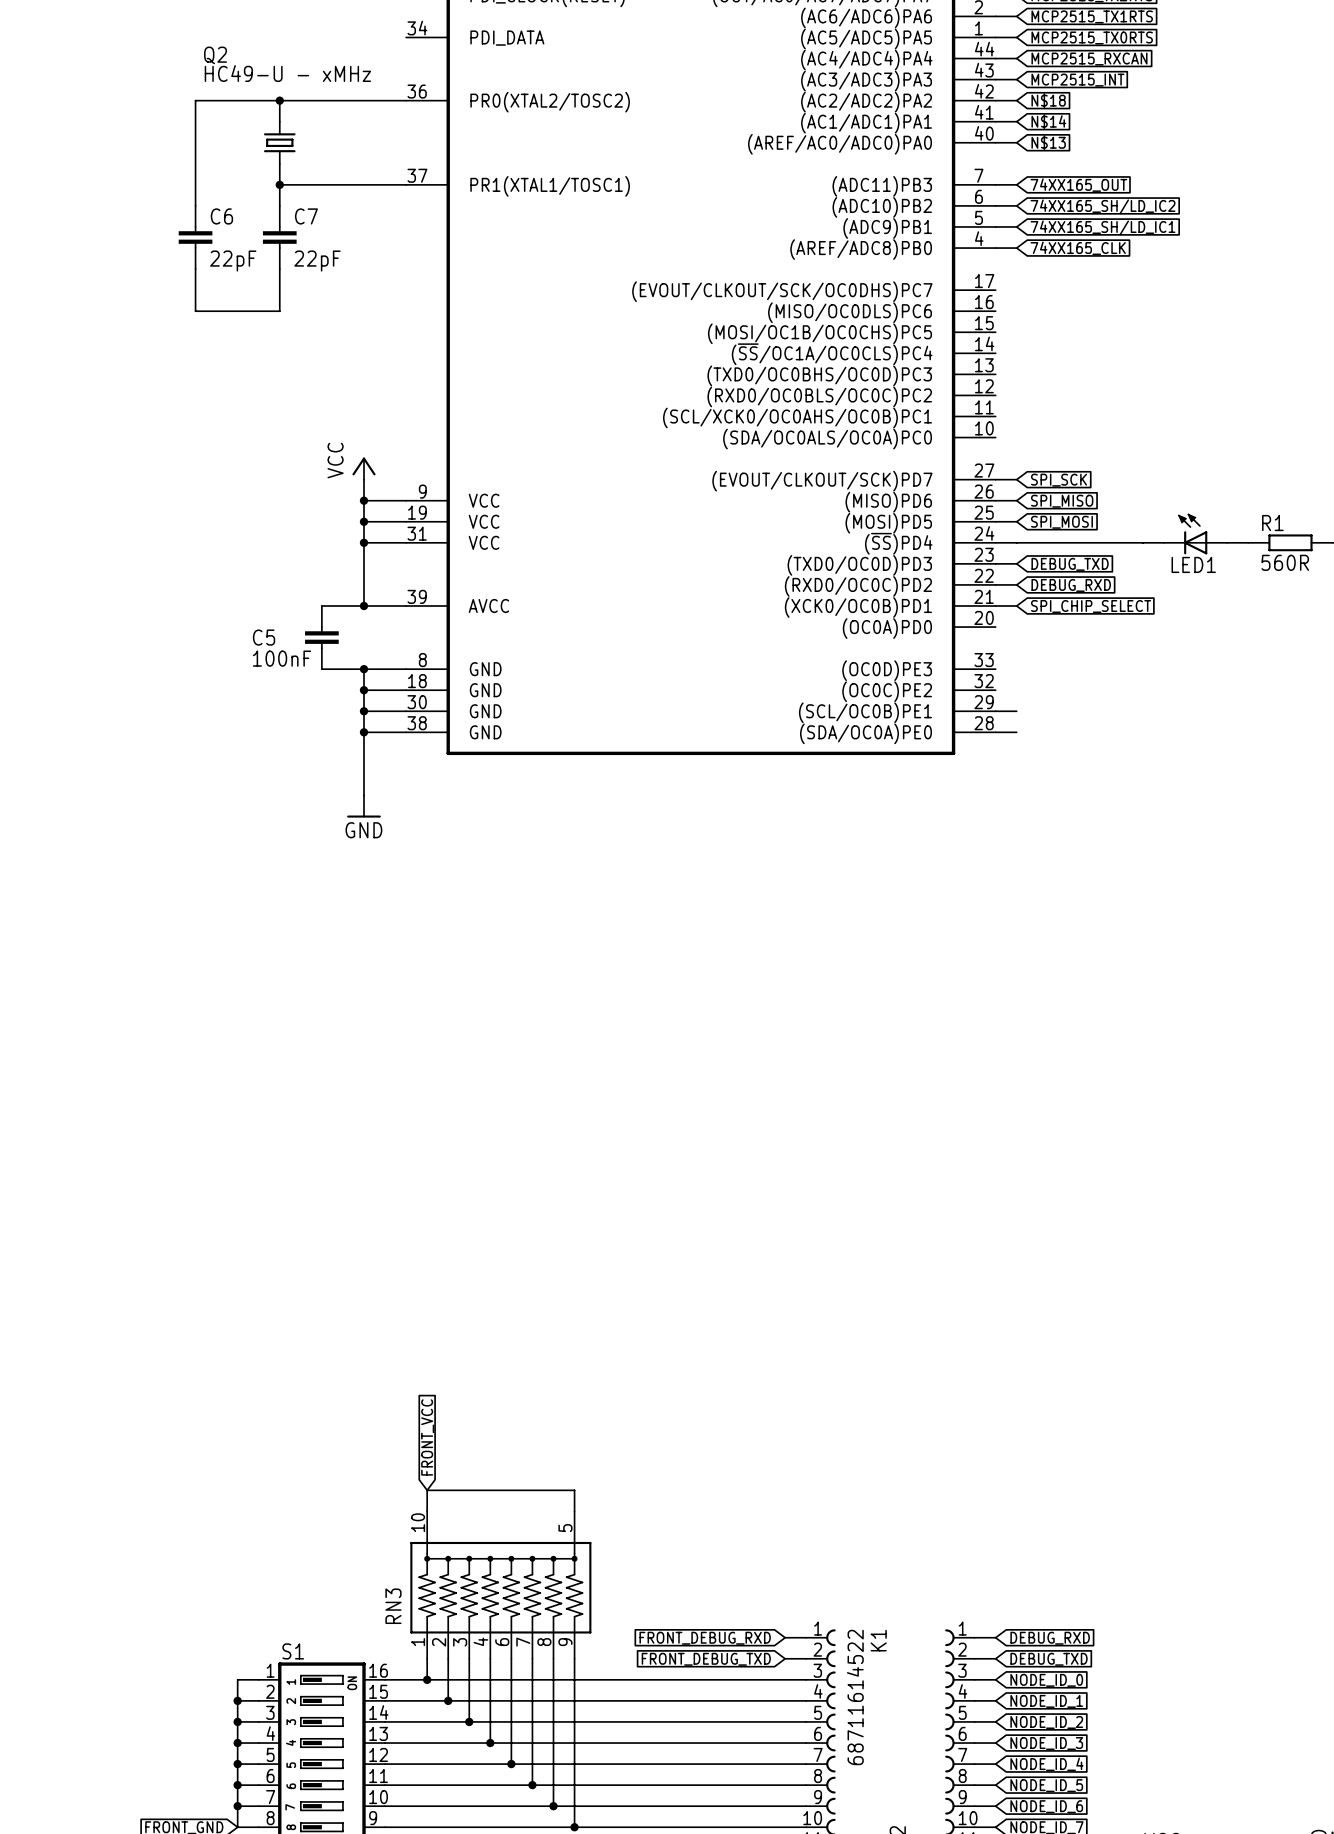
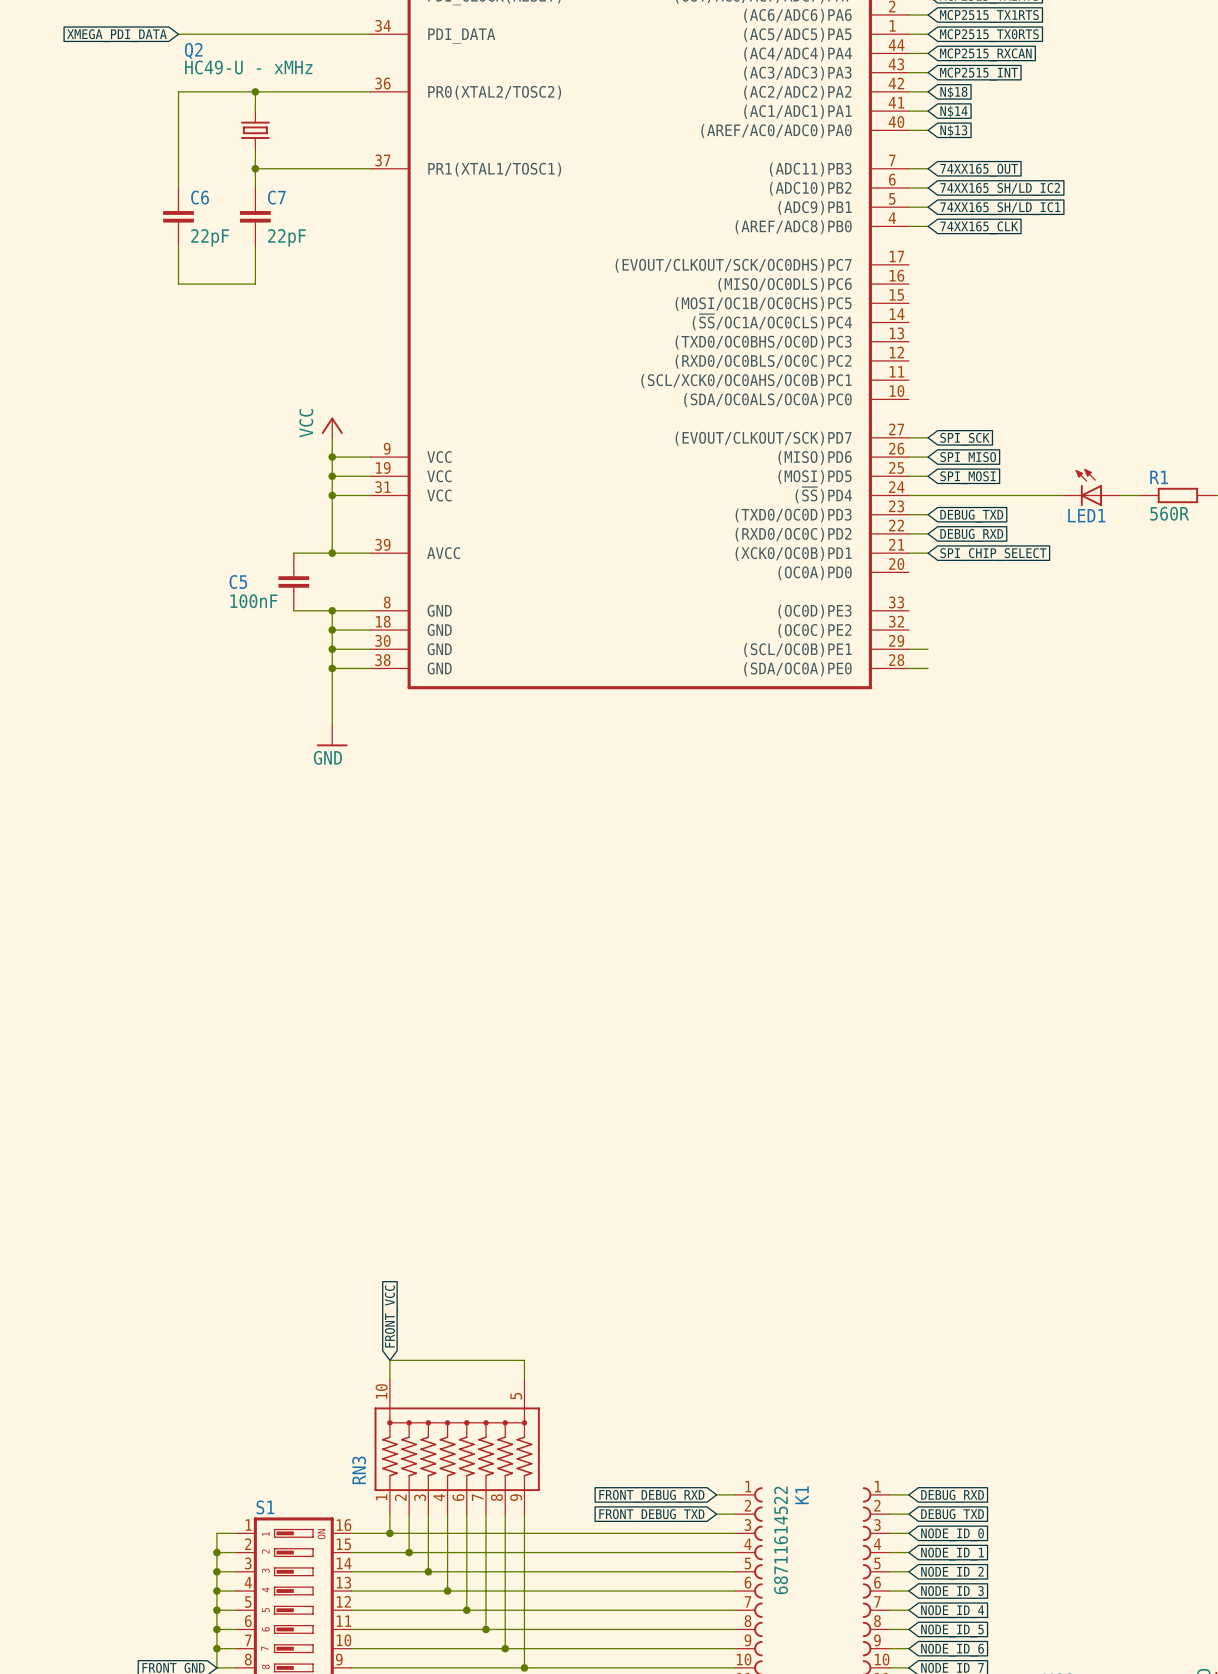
global label: none -> XMEGA_PDI_DATA (116, 35)
wire: none -> (178, 34) (370, 34)

